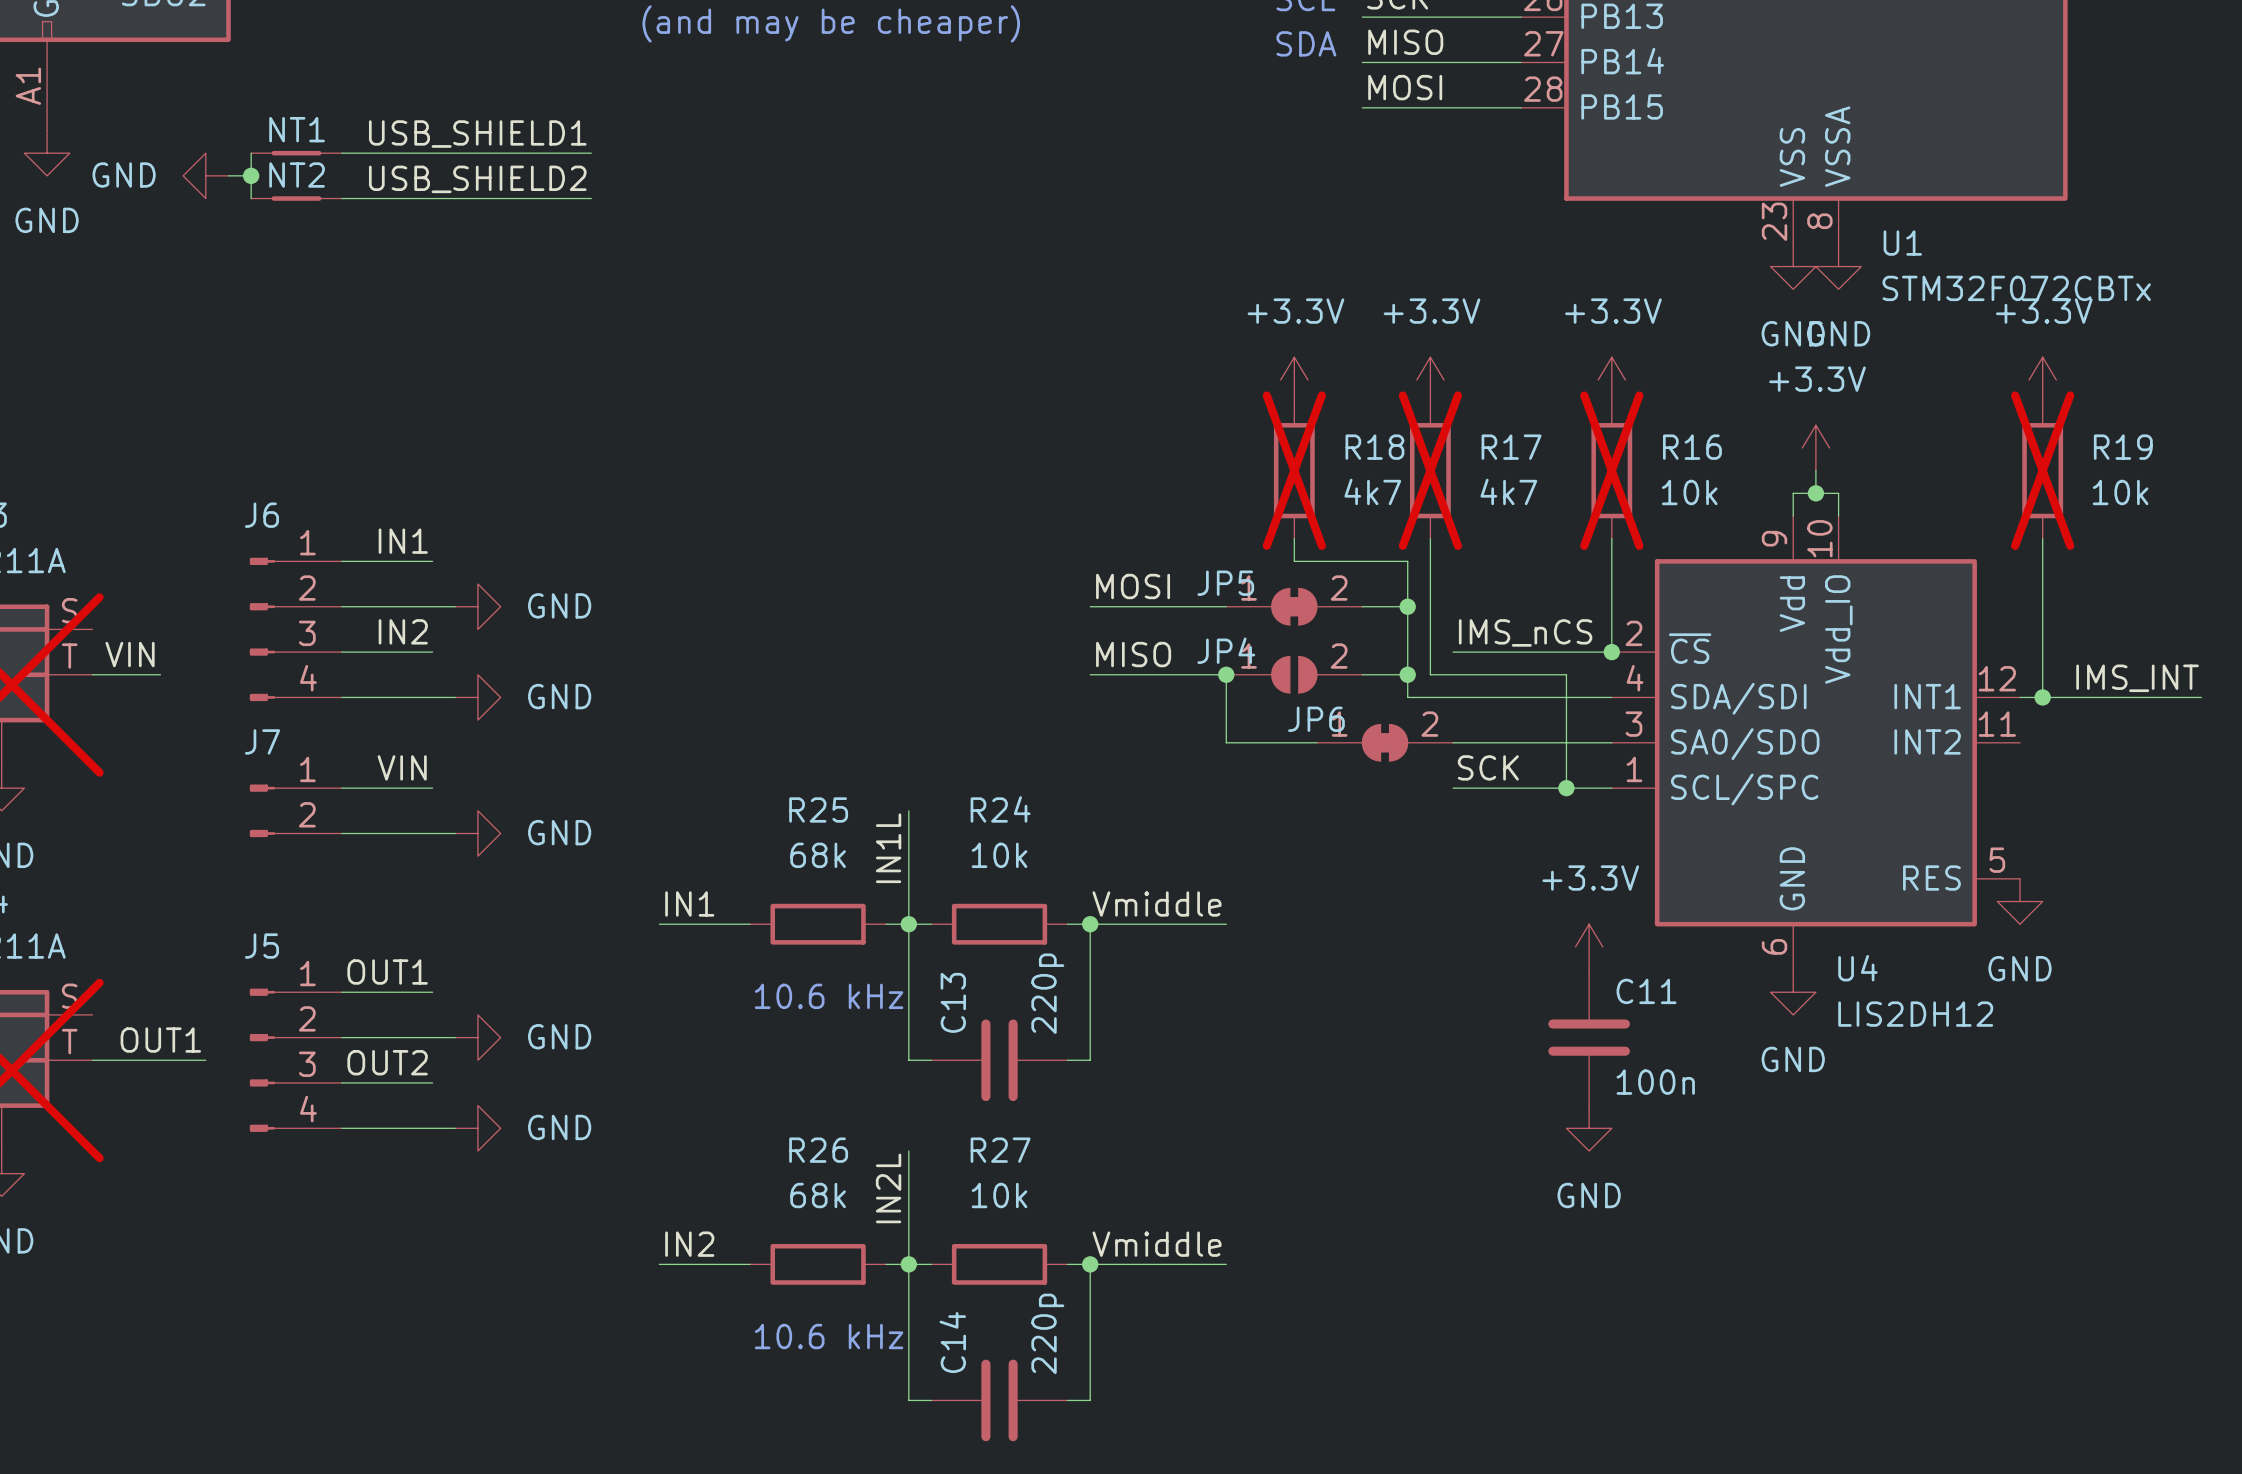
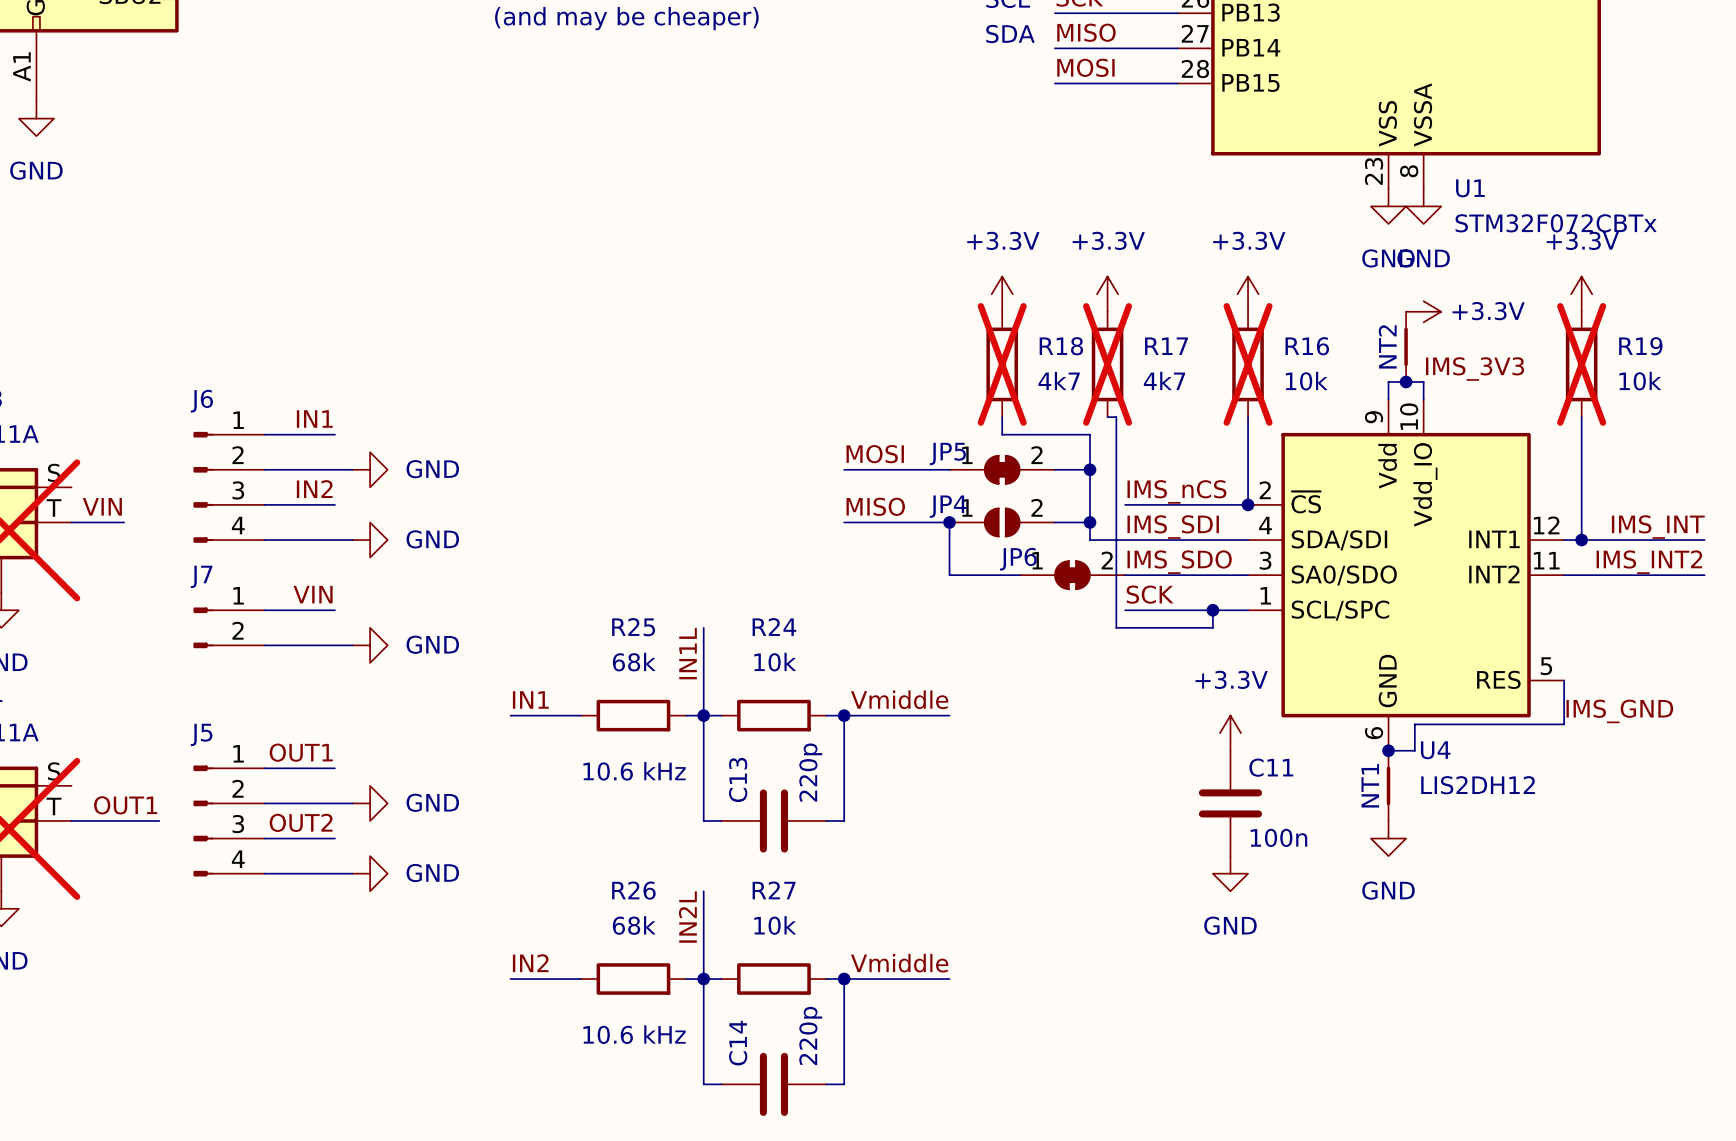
label: USB_SHIELD1 (477, 134) -> none
wire: (251, 153) (251, 198) -> none
NT1 rotation: 0° (296, 153) -> 90° clockwise (1388, 785)
NT1 position: (296, 153) -> (1388, 785)
wire: (341, 153) (591, 153) -> none
power symbol: GND (205, 175) -> none
wire: (228, 175) (251, 175) -> none
junction: (251, 175) -> none
label: USB_SHIELD2 (477, 179) -> none
NT2 rotation: 0° (296, 198) -> 90° clockwise (1406, 346)
NT2 position: (296, 198) -> (1406, 346)
wire: (341, 198) (591, 198) -> none
power symbol rotation: 0° (1815, 447) -> 90° clockwise (1423, 311)
power symbol position: +3.3V (1815, 447) -> +3.3V (1423, 311)
label: none -> IMS_3V3 (1475, 369)
wire: (1430, 538) (1430, 674) (1566, 674) (1566, 788) -> (1107, 417) (1116, 417) (1116, 627) (1212, 627) (1212, 610)
label: none -> IMS_SDI (1173, 527)
label: none -> IMS_SDO (1179, 562)
label: none -> IMS_INT2 (1649, 562)
wire: none -> (1564, 575) (1704, 575)
wire: none -> (1564, 680) (1564, 724) (1414, 724) (1414, 750) (1388, 750)
power symbol: GND (2020, 901) -> none
label: none -> IMS_GND (1619, 711)
junction: none -> (1388, 750)
power symbol position: GND (1793, 992) -> GND (1388, 838)

